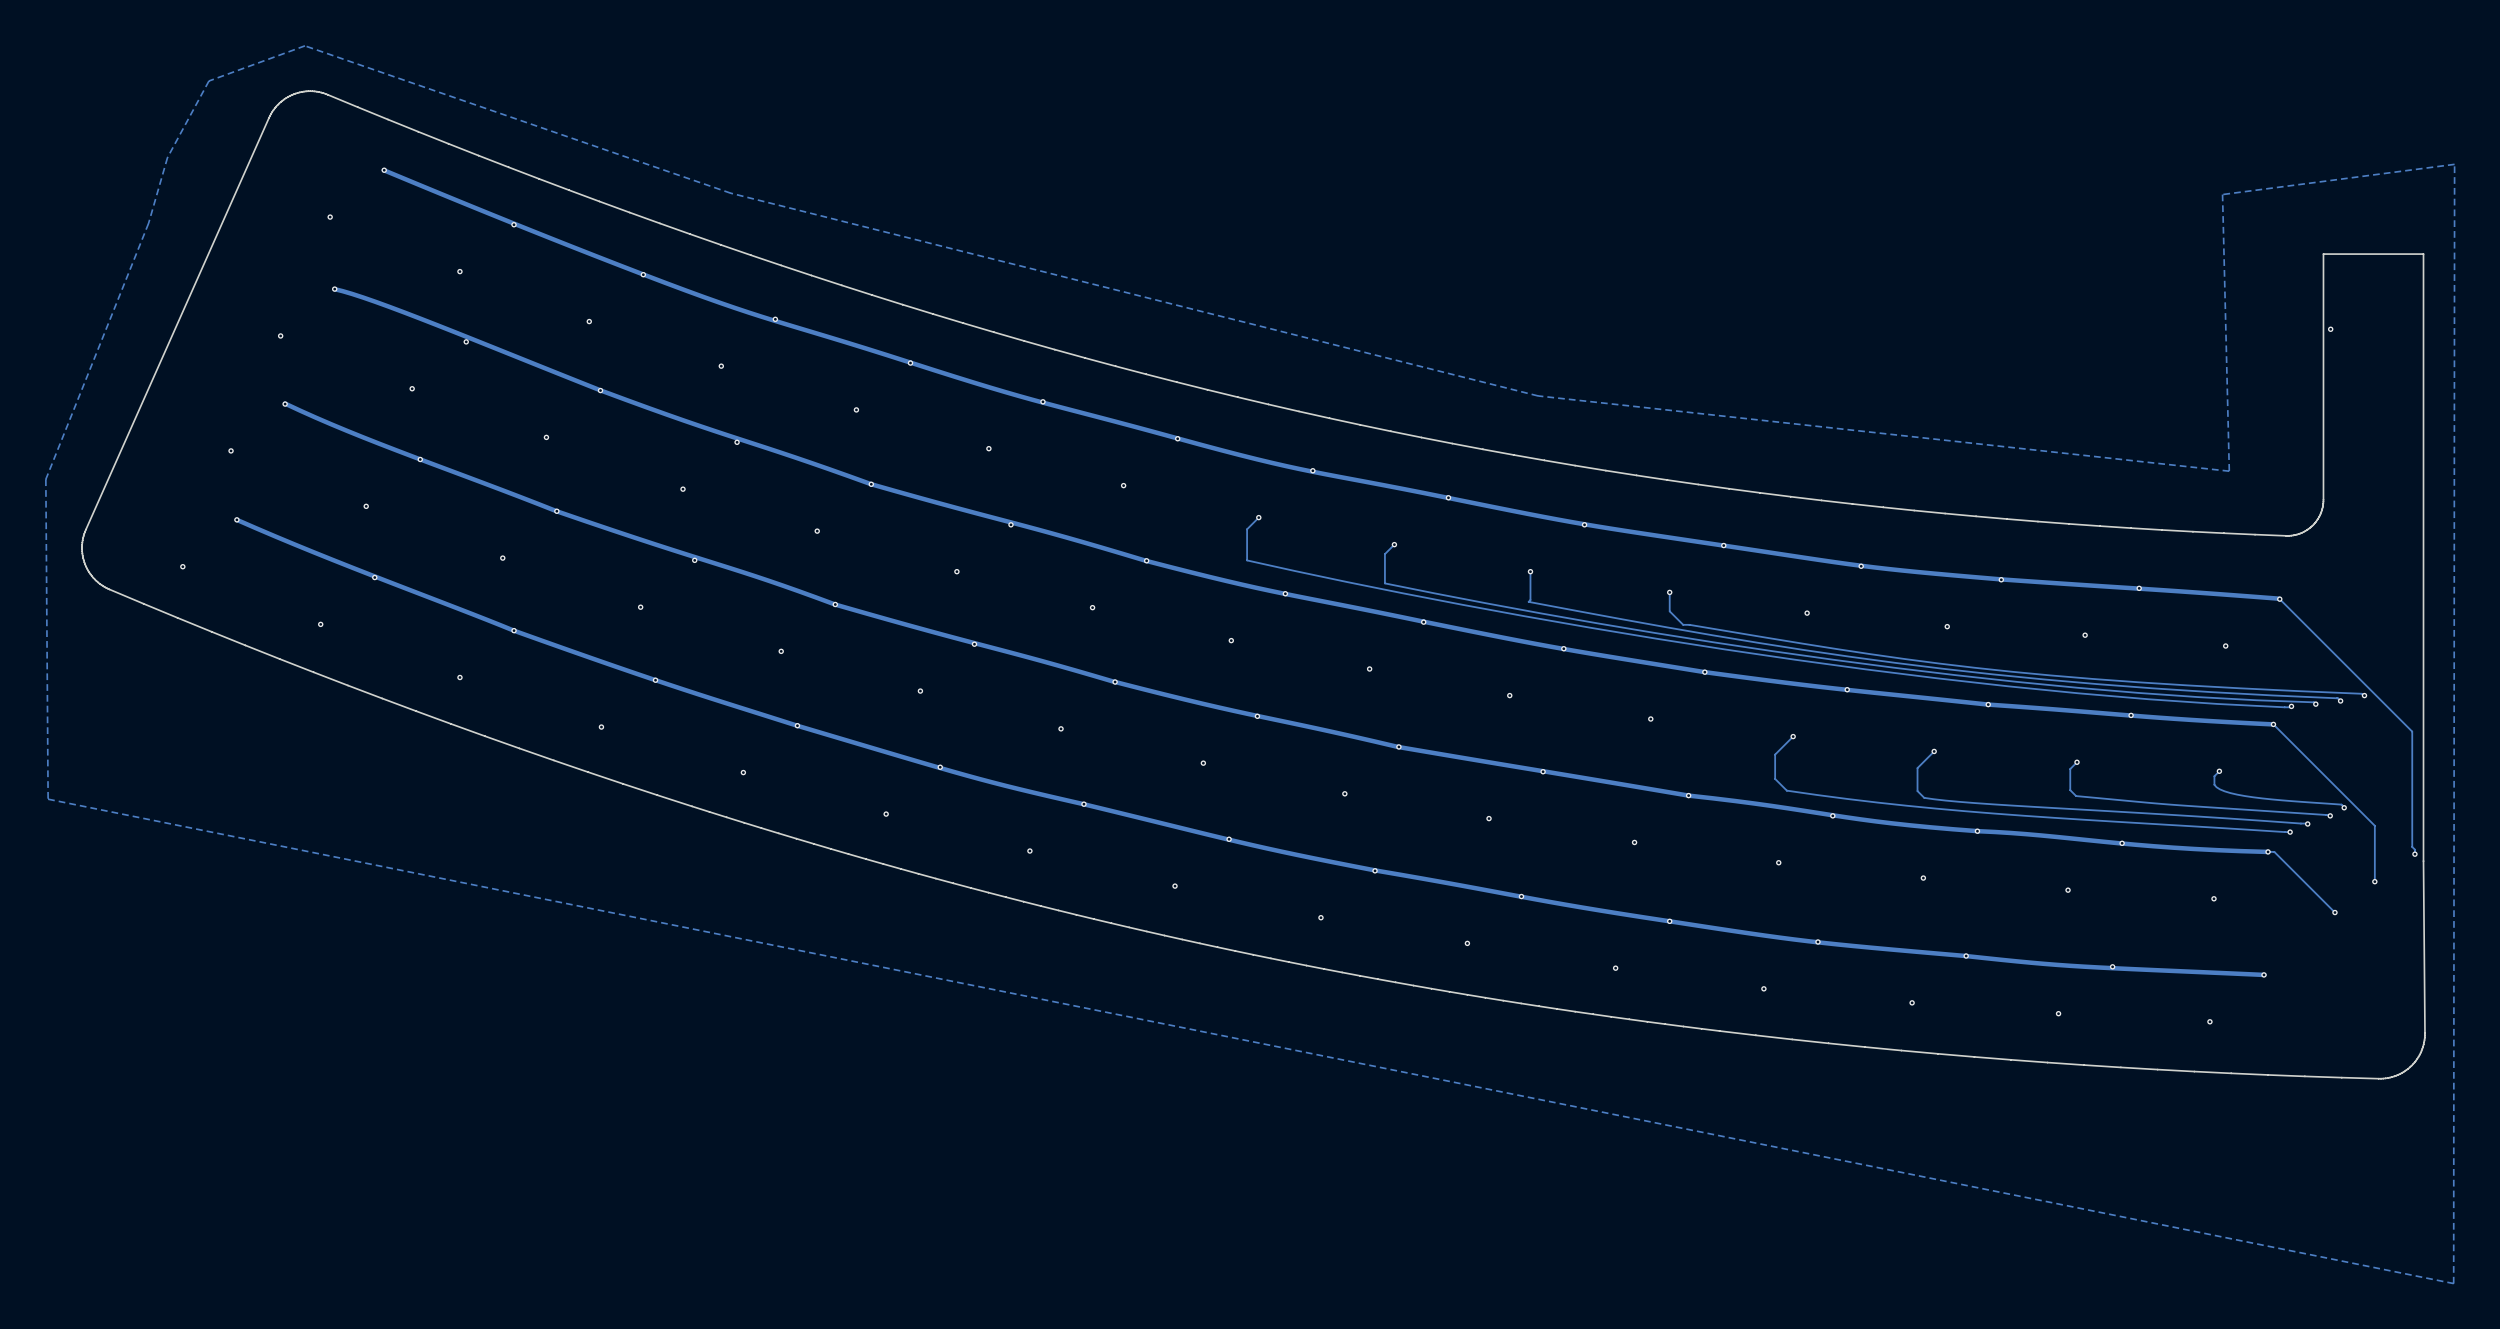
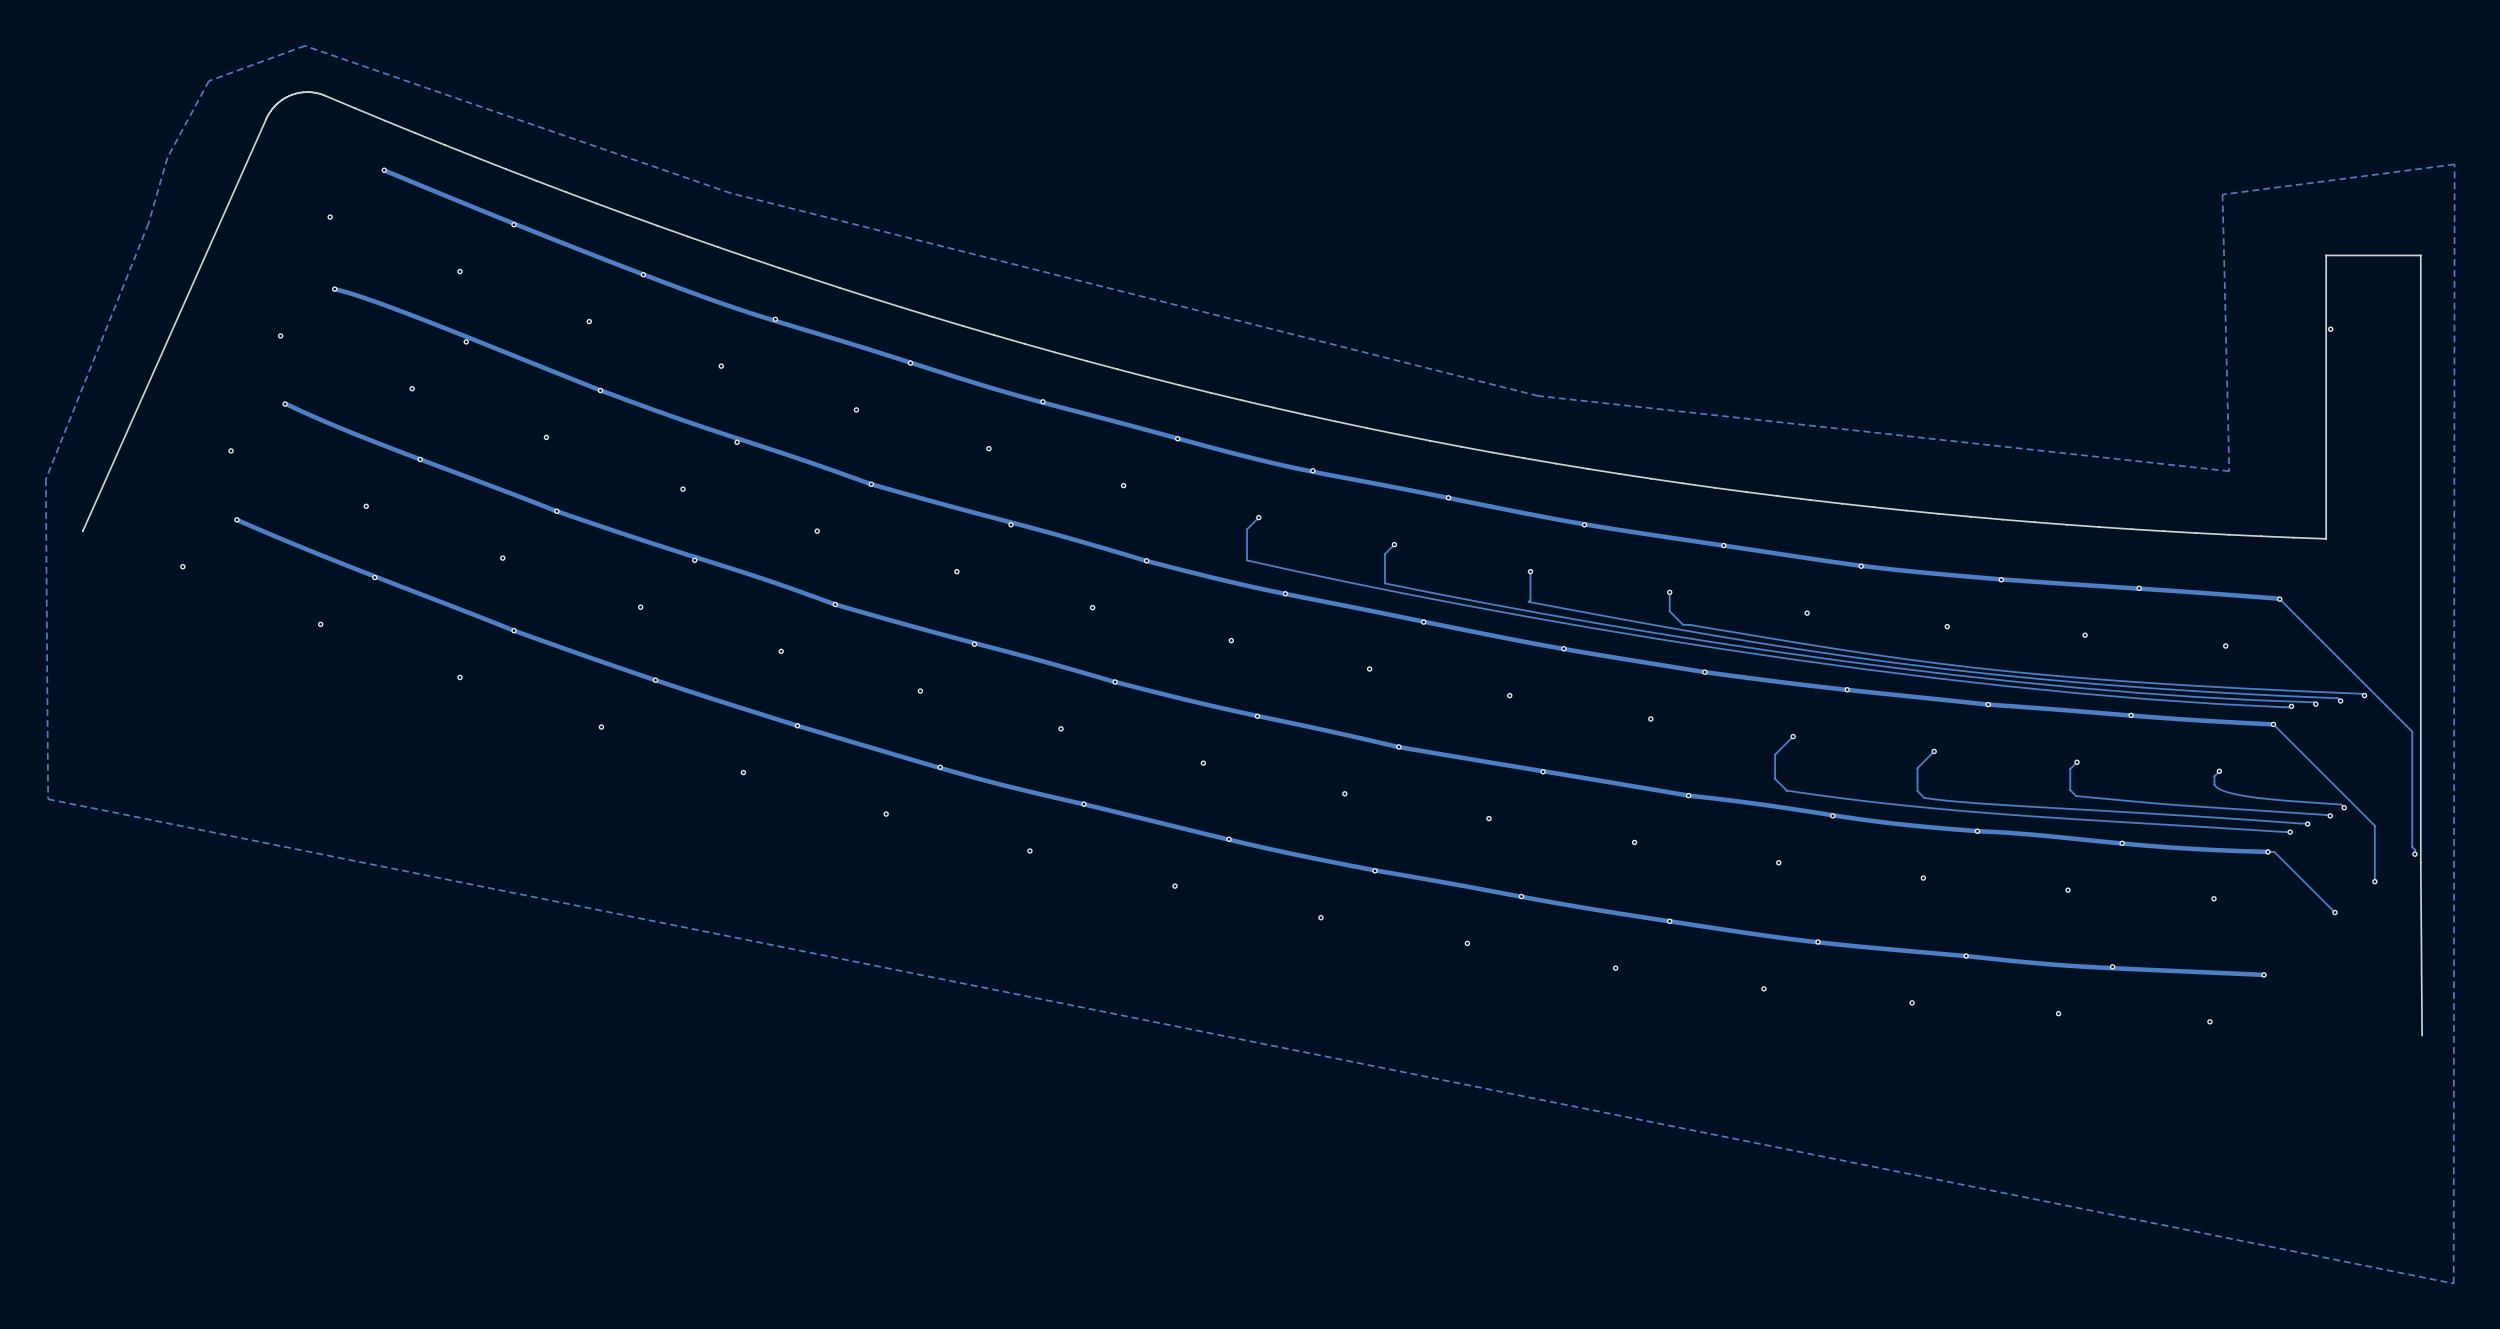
board edge: (312, 91) (325, 93) (569, 190) (781, 265) (993, 332) (1207, 389) (1390, 431) (1605, 470) (1821, 500) (2037, 521) (2286, 535) (2296, 534) (2308, 529) (2319, 517) (2323, 501) (2323, 254) (2423, 254) (2424, 1033) (2420, 1052) (2413, 1064) (2404, 1071) (2392, 1077) (2381, 1078) (2194, 1071) (1974, 1056) (1792, 1039) (1629, 1019) (1449, 991) (1288, 962) (1146, 931) (1005, 897) (865, 859) (709, 811) (553, 760) (416, 711) (245, 645) (107, 588) (93, 577) (85, 564) (82, 549) (85, 531) (270, 115) (277, 105) (287, 97) (299, 92) (312, 91) -> none
board edge: none -> (82, 530) (267, 116) (281, 100) (301, 92) (322, 94) (566, 192) (809, 278) (1024, 343) (1210, 392) (1429, 440) (1619, 473) (1842, 503) (2067, 524) (2326, 538) (2326, 255) (2420, 255) (2422, 1035)

